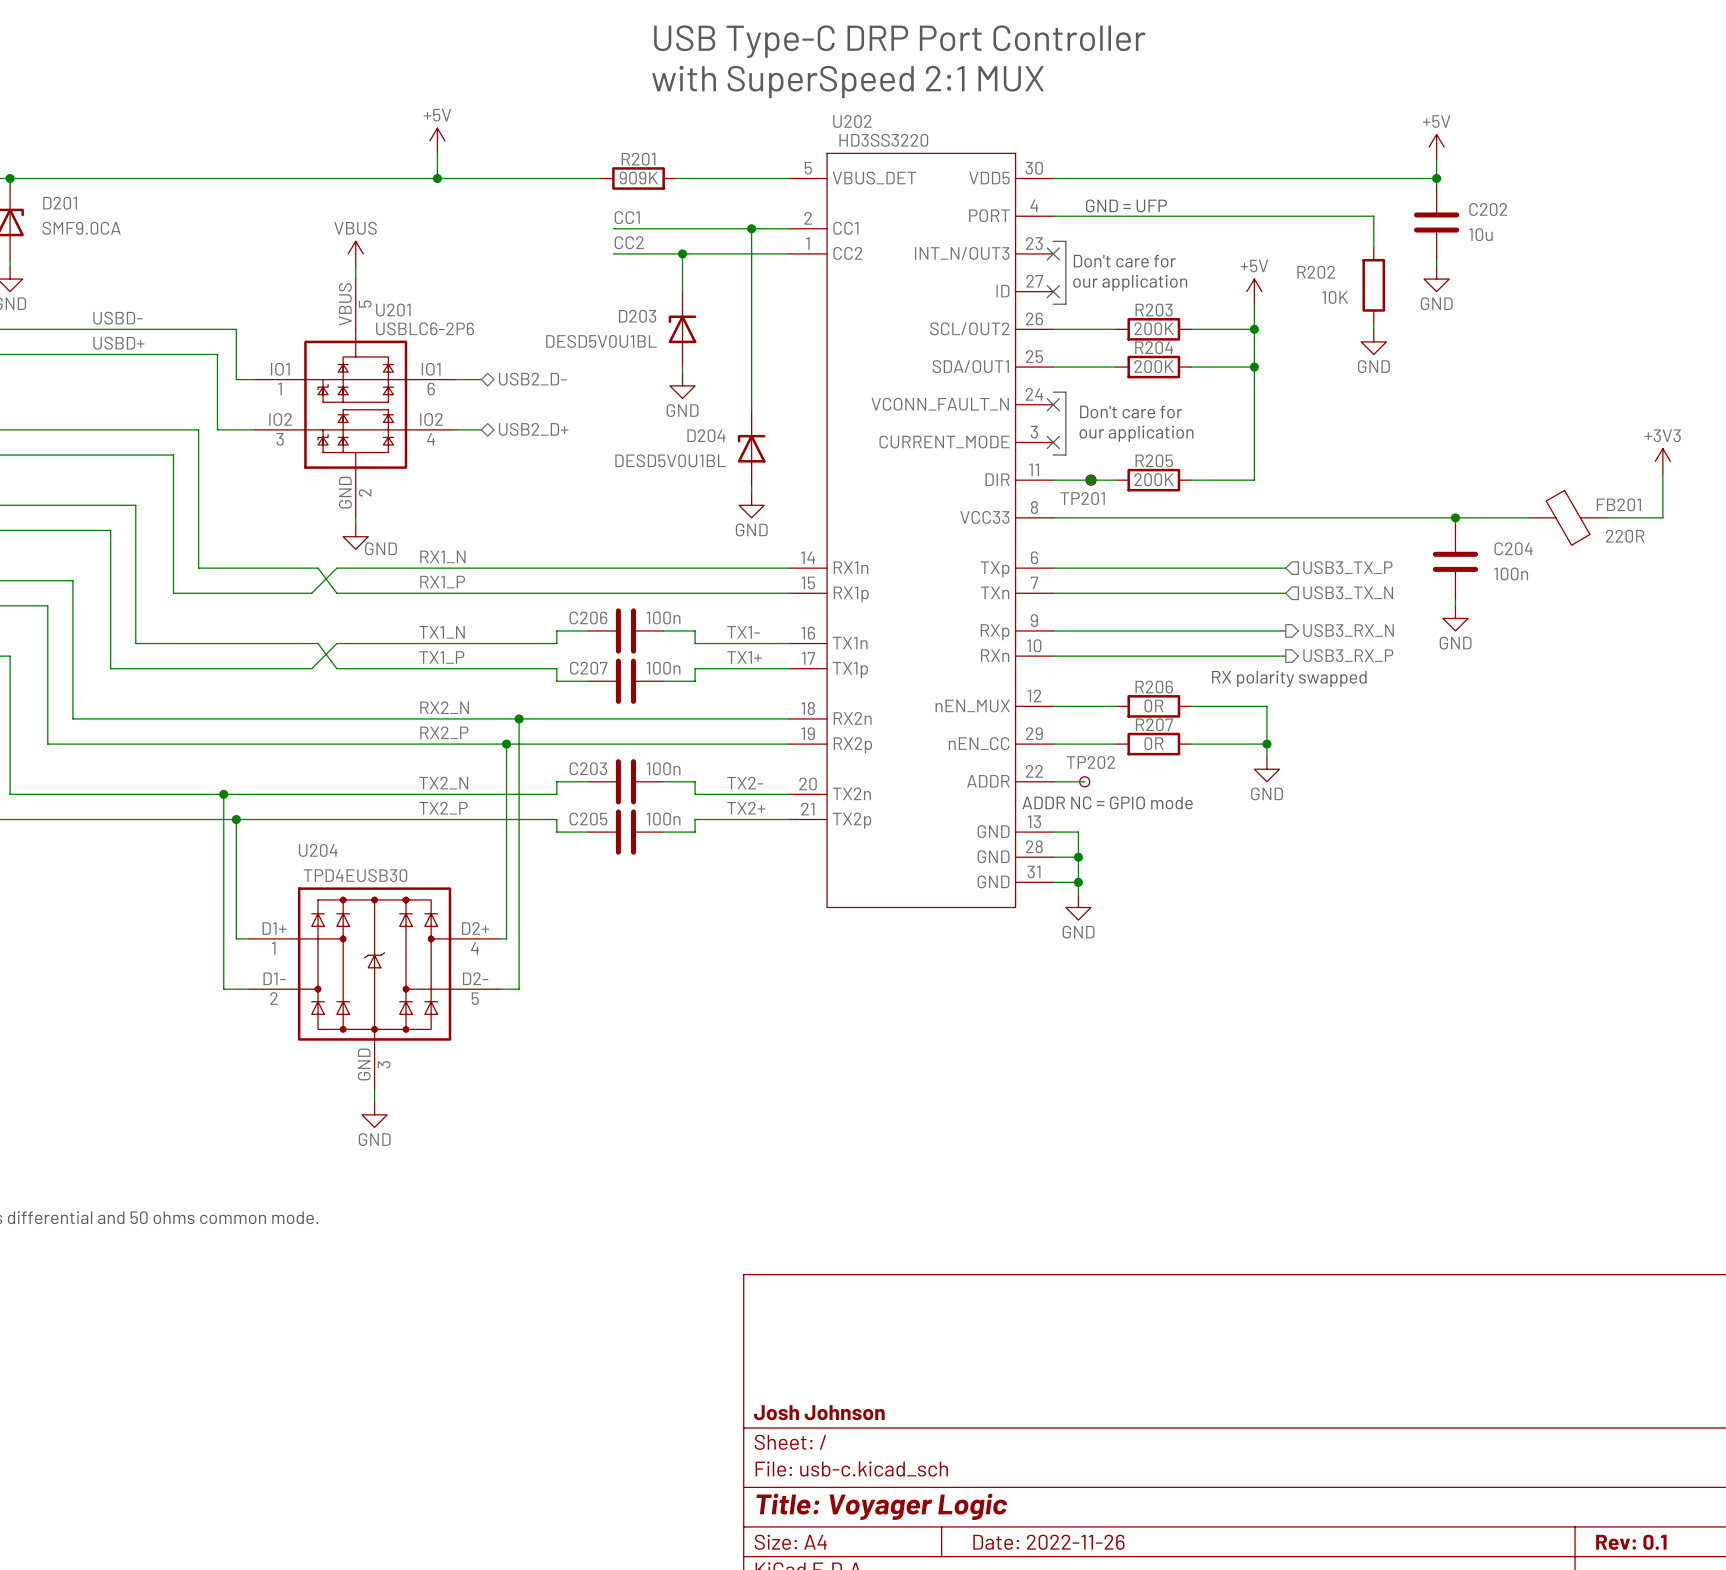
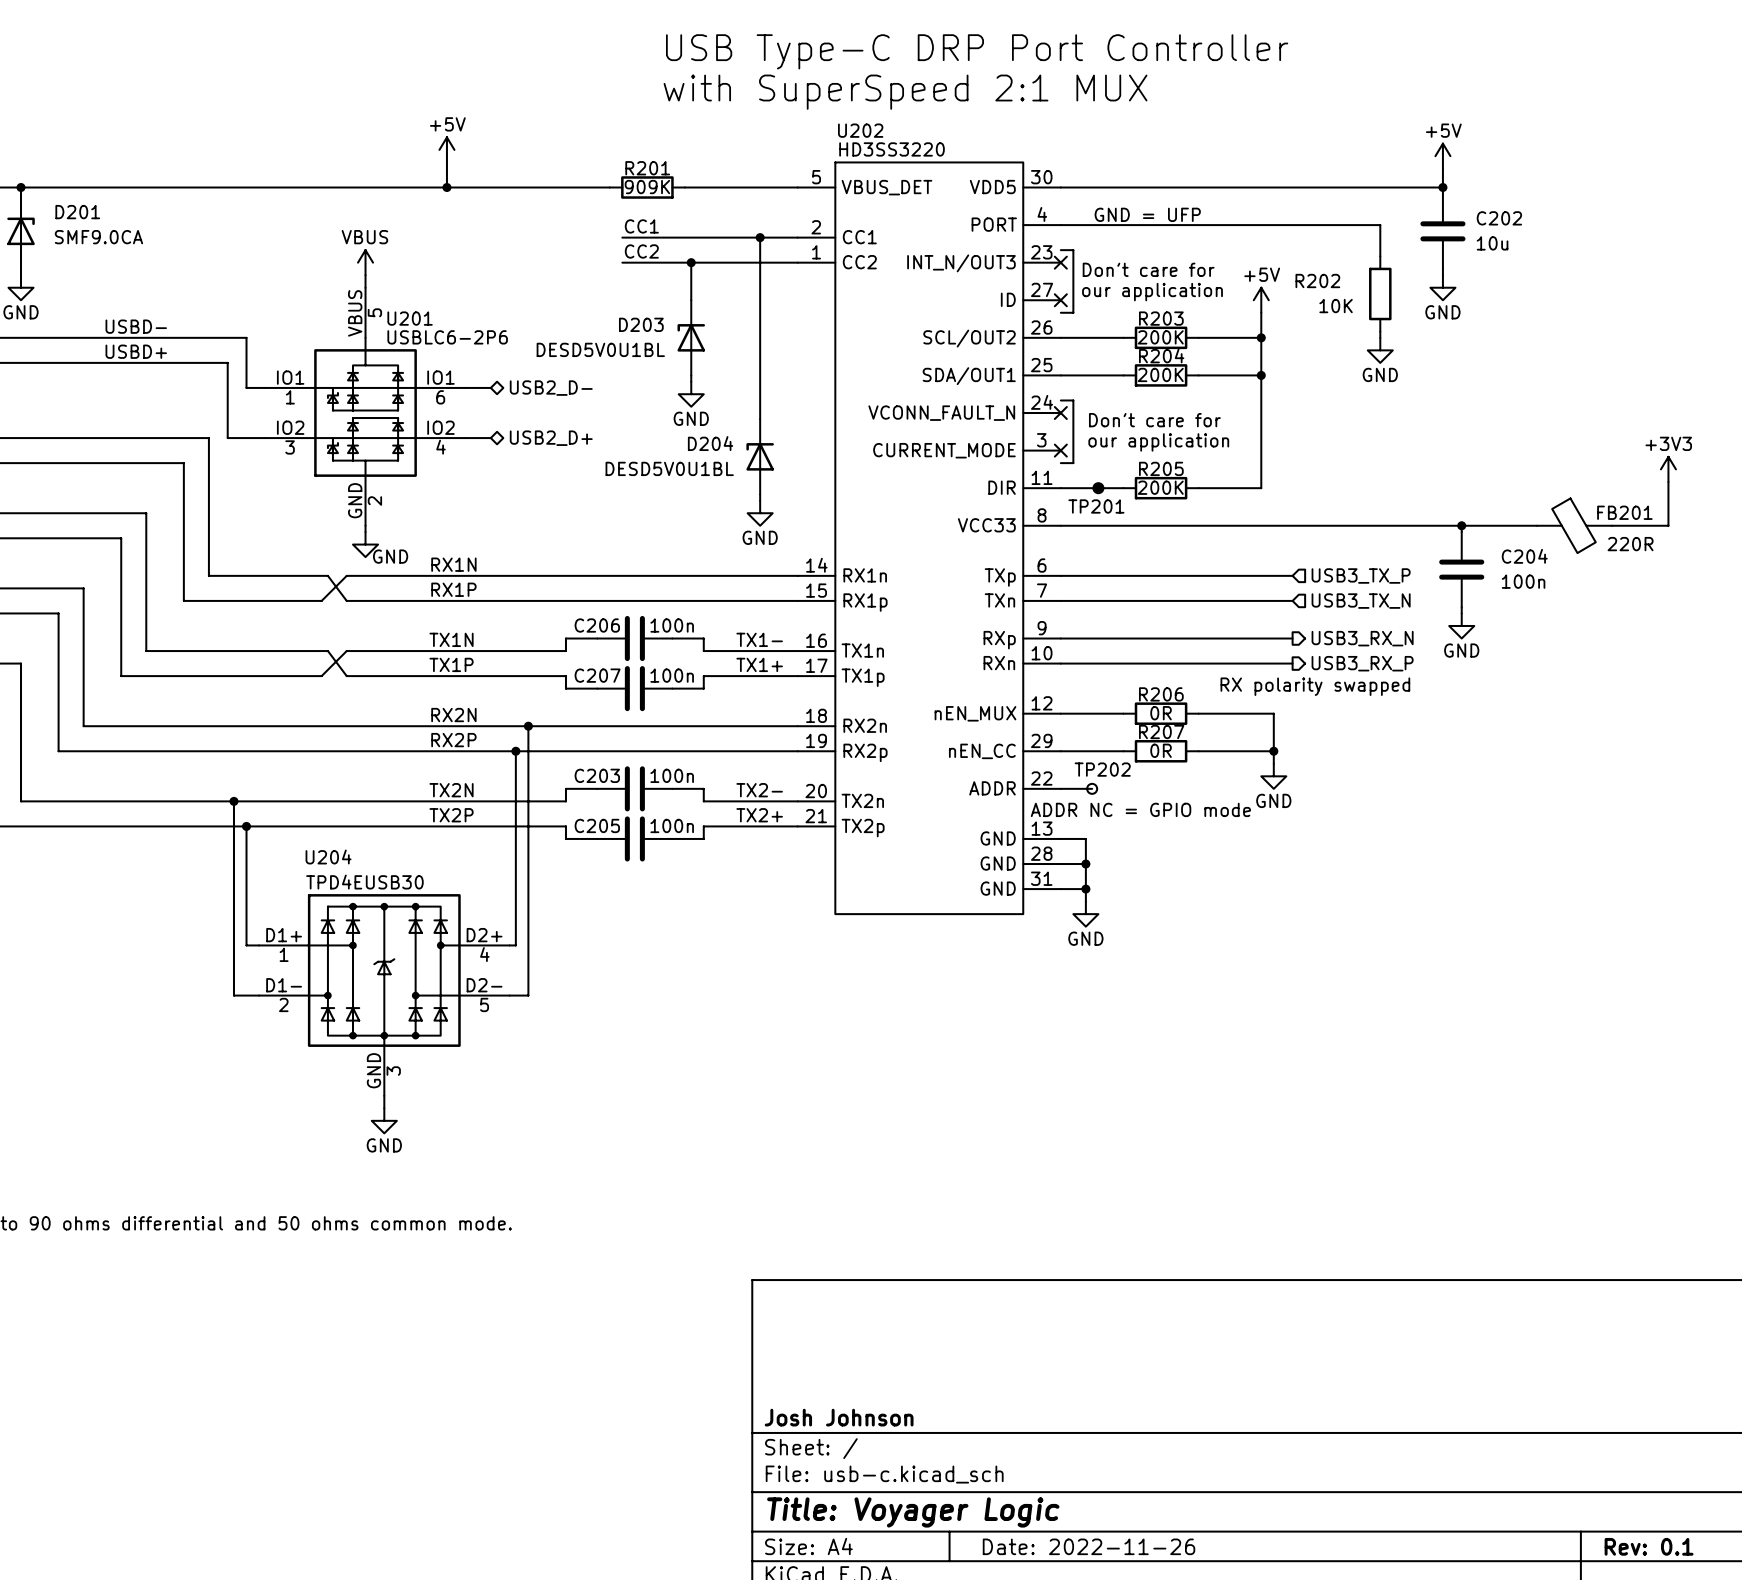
label: RX1_N (442, 556) -> RX1N (453, 564)
label: RX1_P (442, 582) -> RX1P (453, 589)
label: TX1_N (442, 632) -> TX1N (451, 639)
label: TX1_P (441, 657) -> TX1P (451, 664)
label: RX2_N (444, 707) -> RX2N (453, 715)
label: RX2_P (444, 732) -> RX2P (453, 740)
label: TX2_N (443, 783) -> TX2N (451, 790)
label: TX2_P (443, 808) -> TX2P (451, 815)

